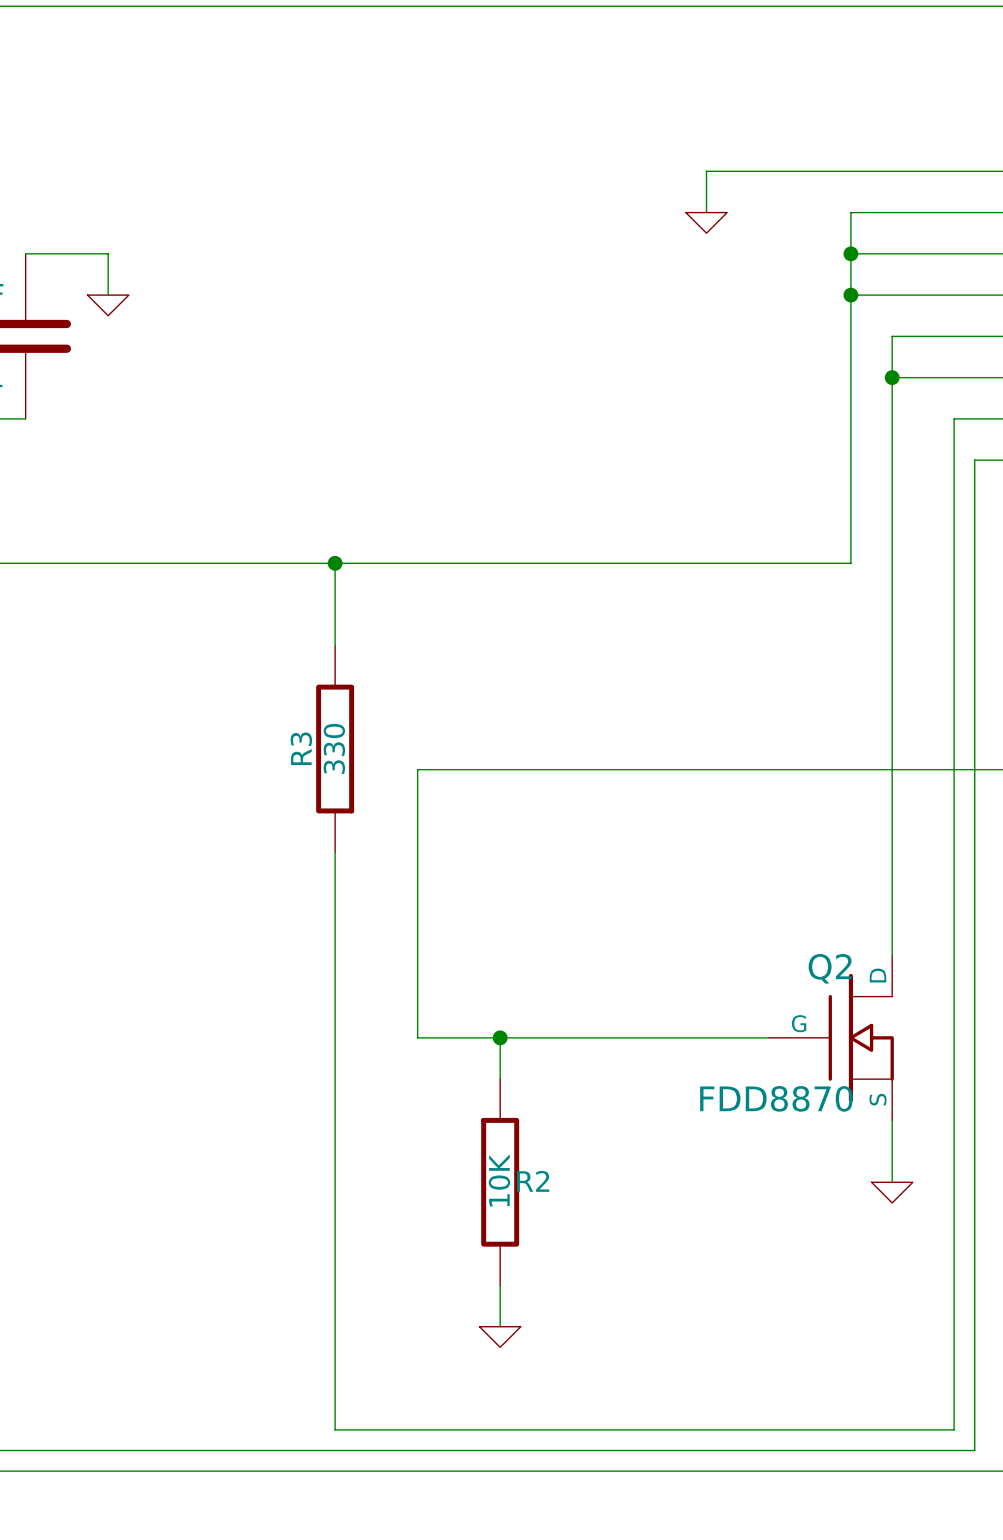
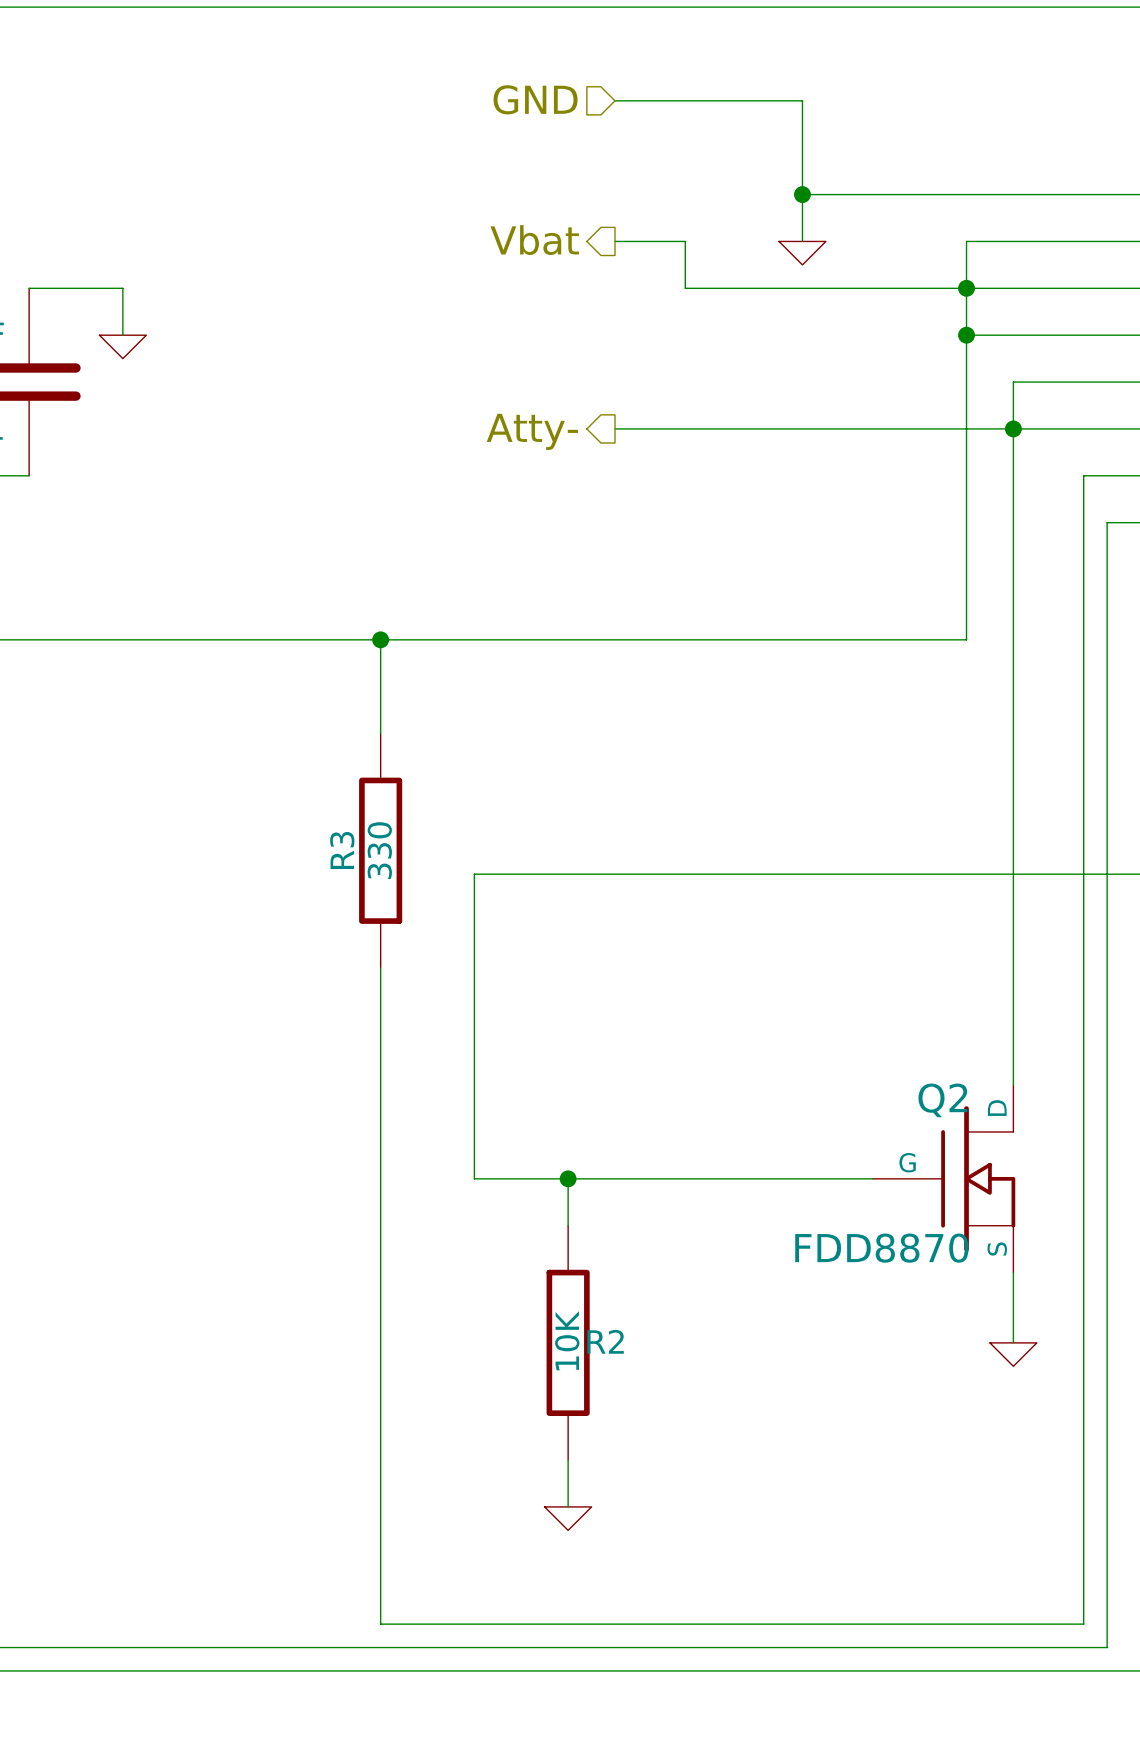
hierarchical label: none -> GND (535, 99)
wire: none -> (614, 100) (802, 100) (802, 194)
junction: none -> (802, 194)
hierarchical label: none -> Vbat (534, 240)
wire: none -> (614, 241) (685, 241) (685, 288) (966, 288)
wire: none -> (614, 428) (1013, 428)
hierarchical label: none -> Atty- (532, 431)

